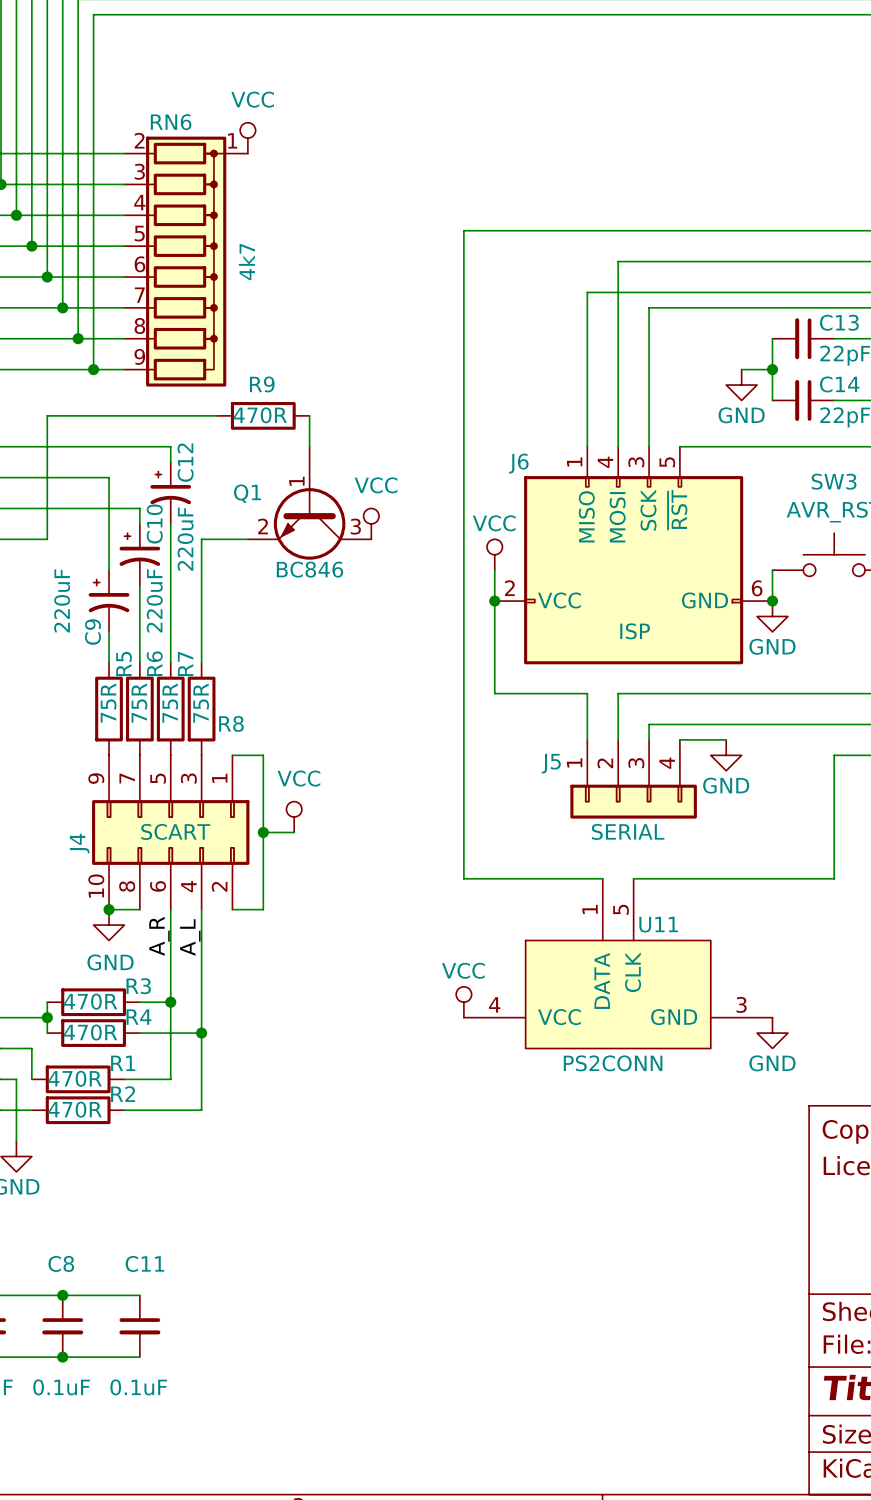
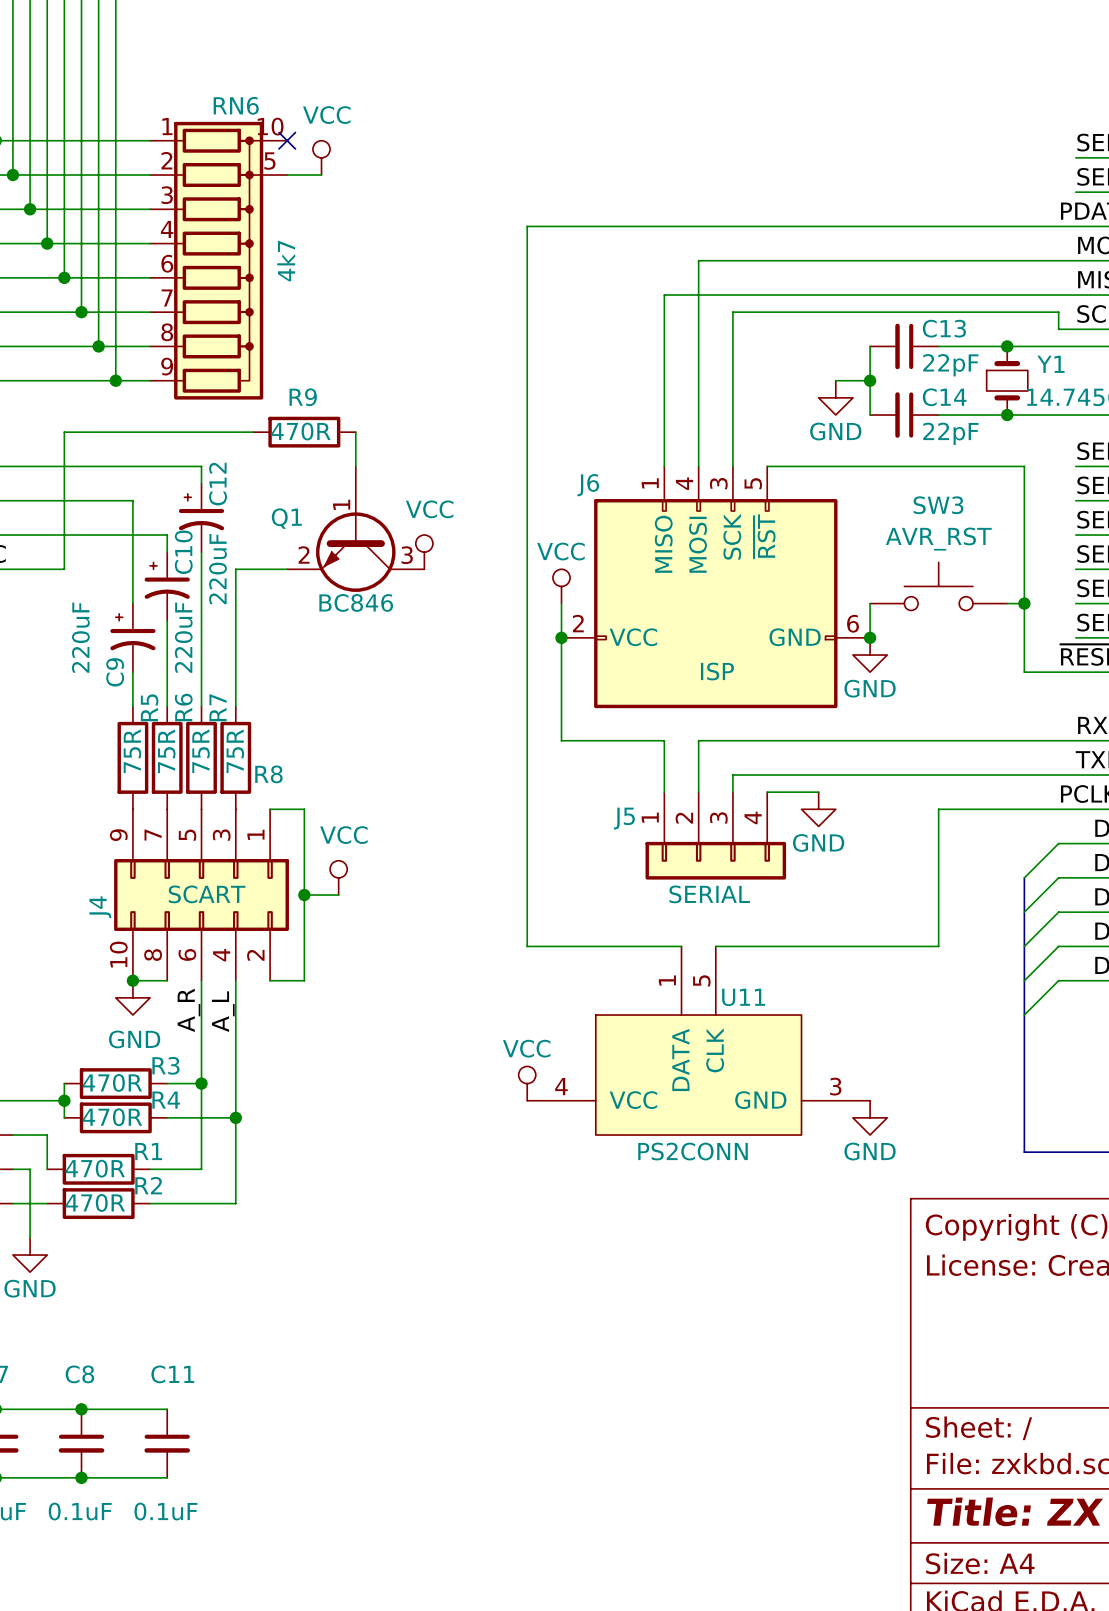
RN6 name position: RN6 (171, 122) -> RN6 (236, 105)
RN6 symbol: [124, 136, 248, 387] -> [150, 121, 288, 400]
power symbol position: VCC (247, 138) -> VCC (321, 157)
no-connect mark: none -> (287, 140)
wire: none -> (287, 175) (321, 175)

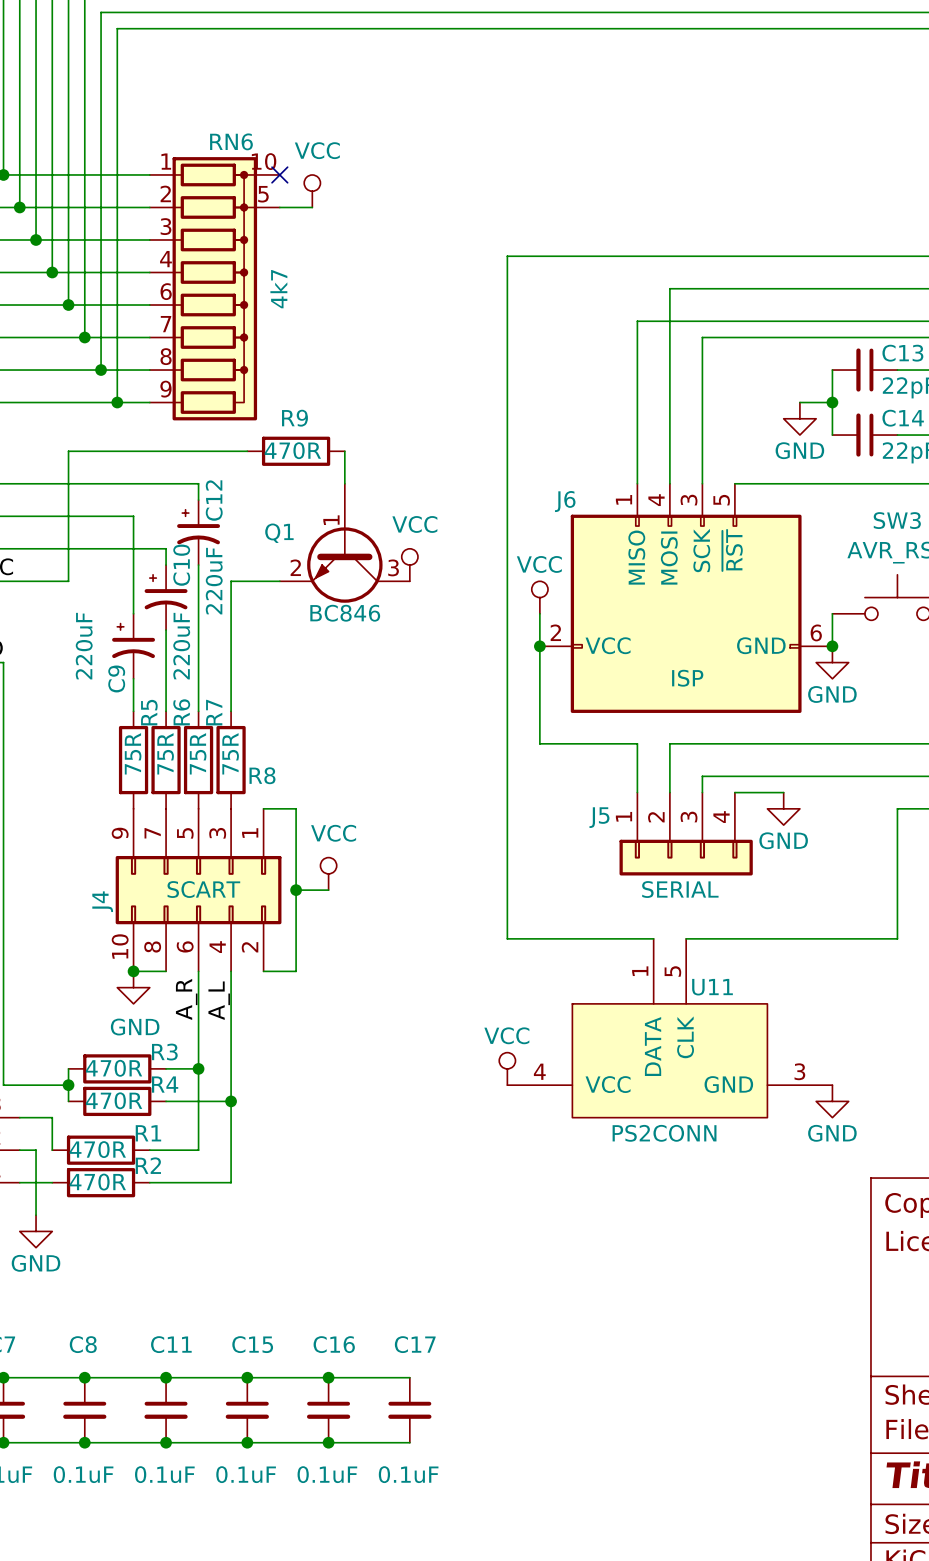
wire: none -> (166, 1377) (409, 1377)
junction: none -> (166, 1377)
junction: none -> (247, 1377)
junction: none -> (328, 1377)
C15: none -> 0.1uF (247, 1410)
C16: none -> 0.1uF (328, 1410)
C17: none -> 0.1uF (409, 1410)
wire: none -> (166, 1442) (409, 1442)
junction: none -> (166, 1442)
junction: none -> (247, 1442)
junction: none -> (328, 1442)

